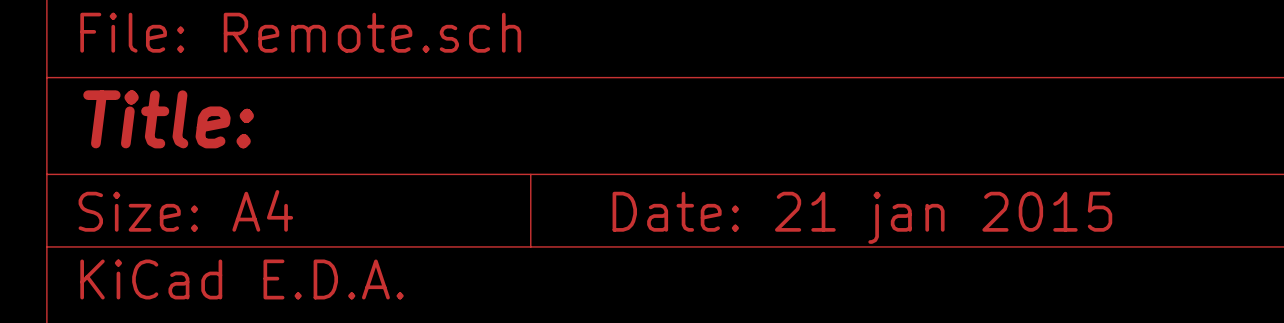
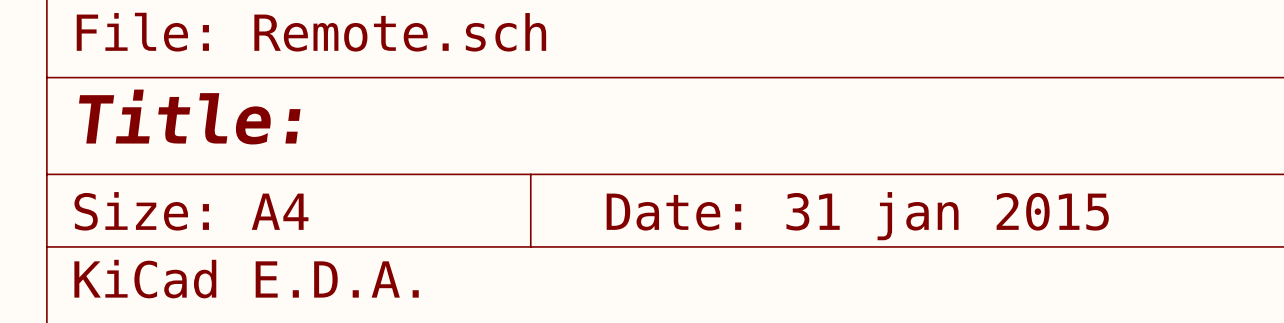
title block: Date: 21 jan 2015 (862, 217) -> Date: 31 jan 2015 (857, 216)

